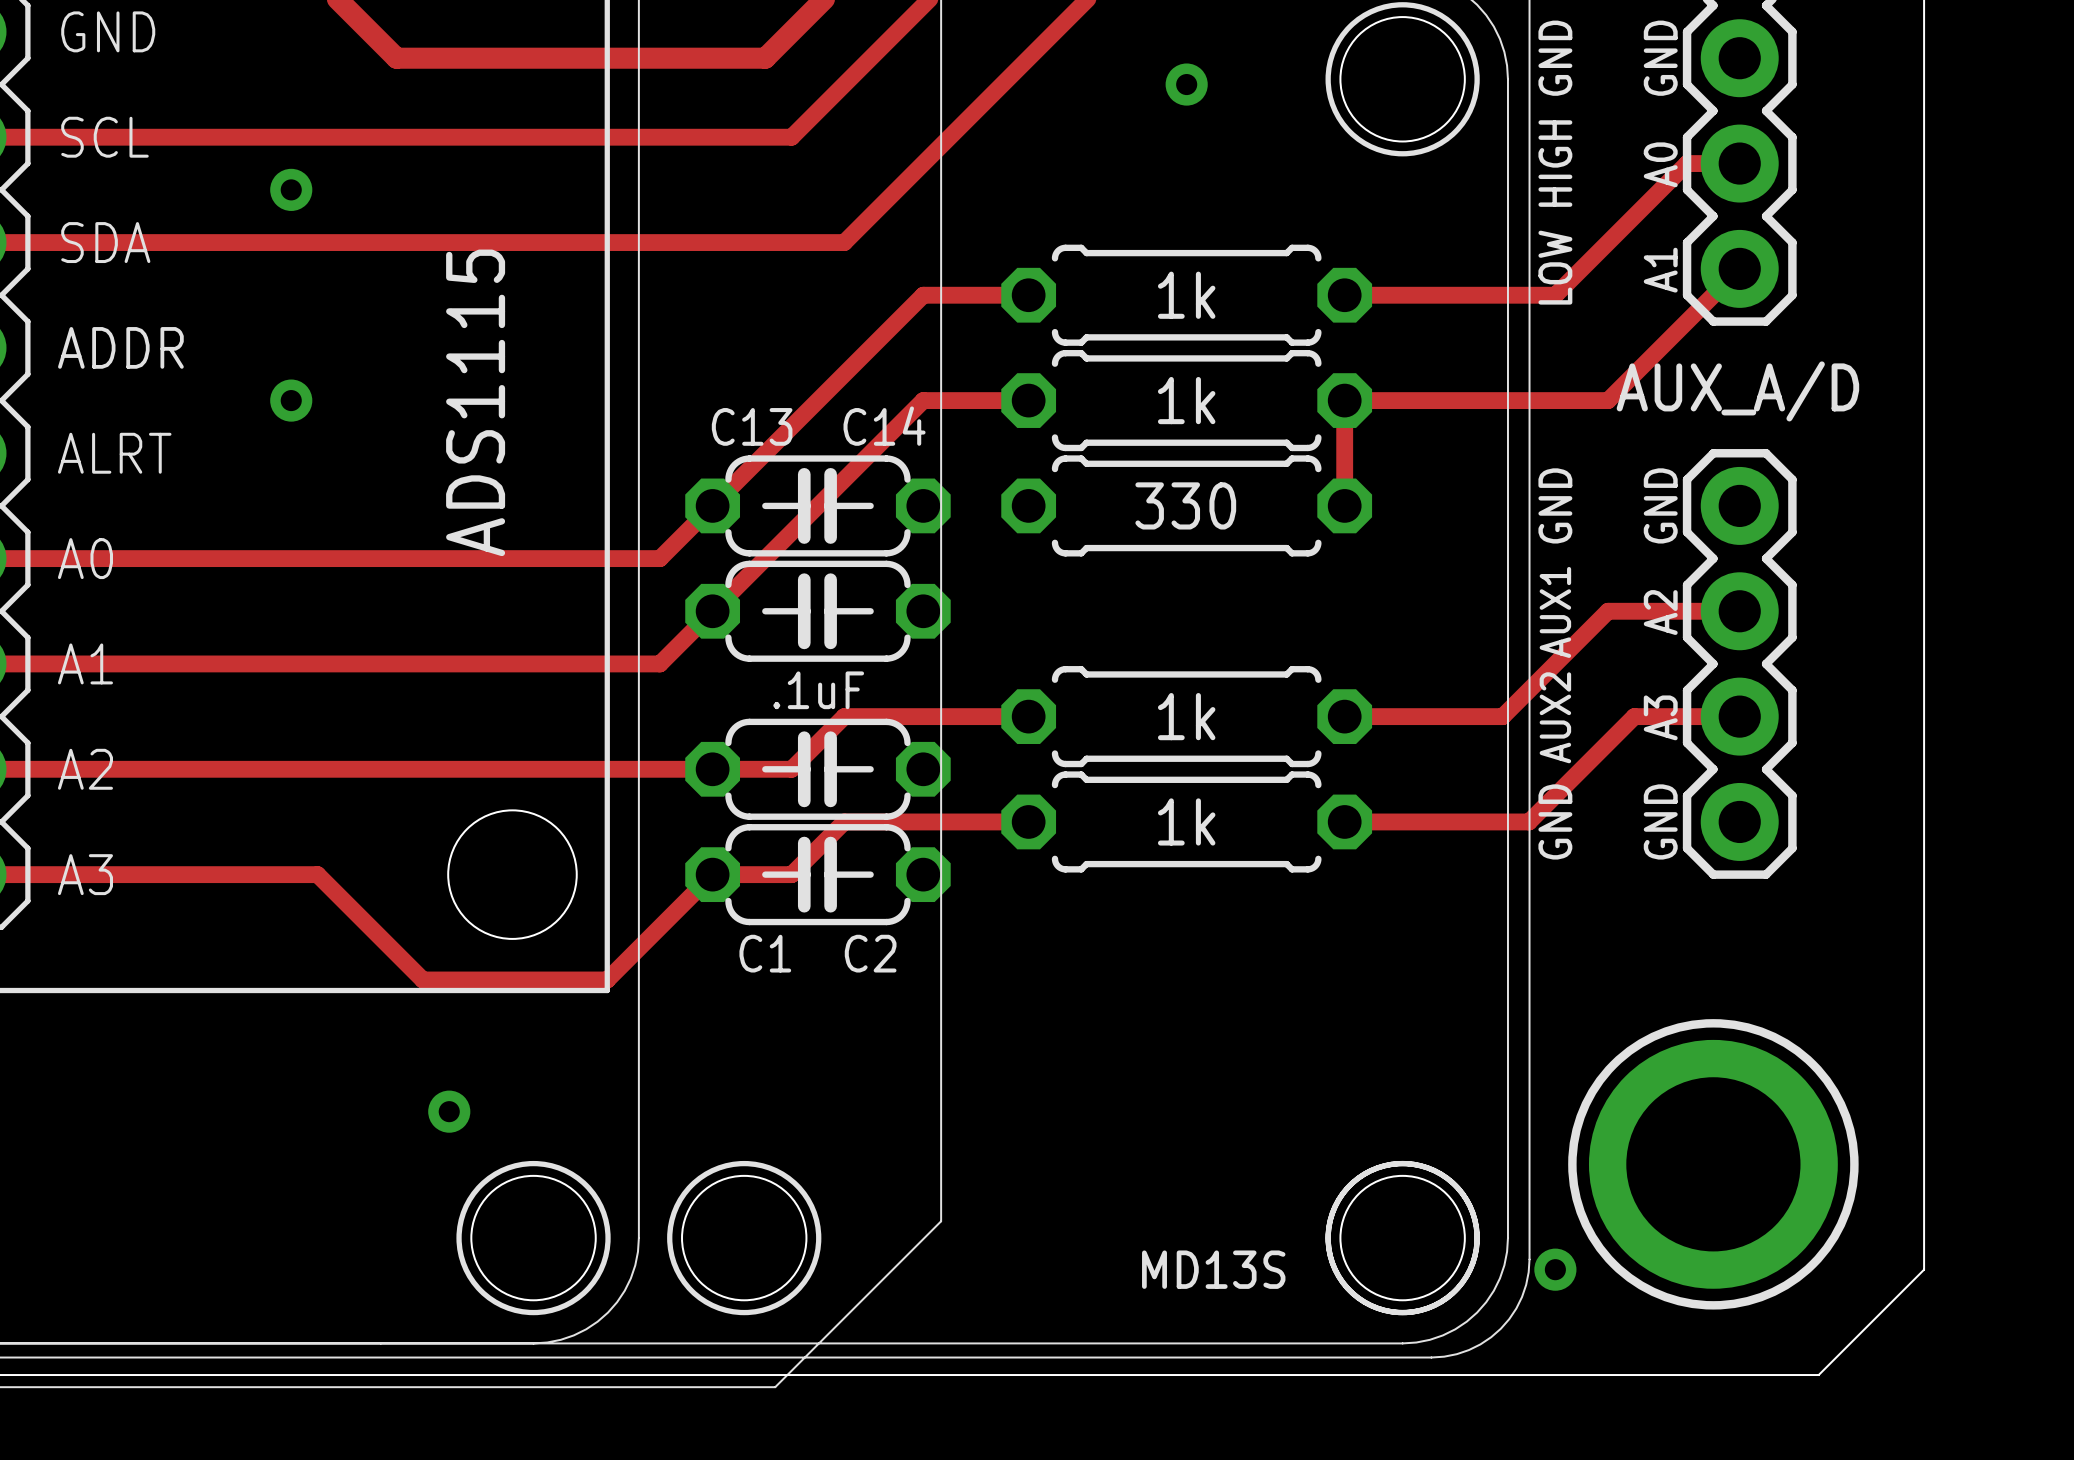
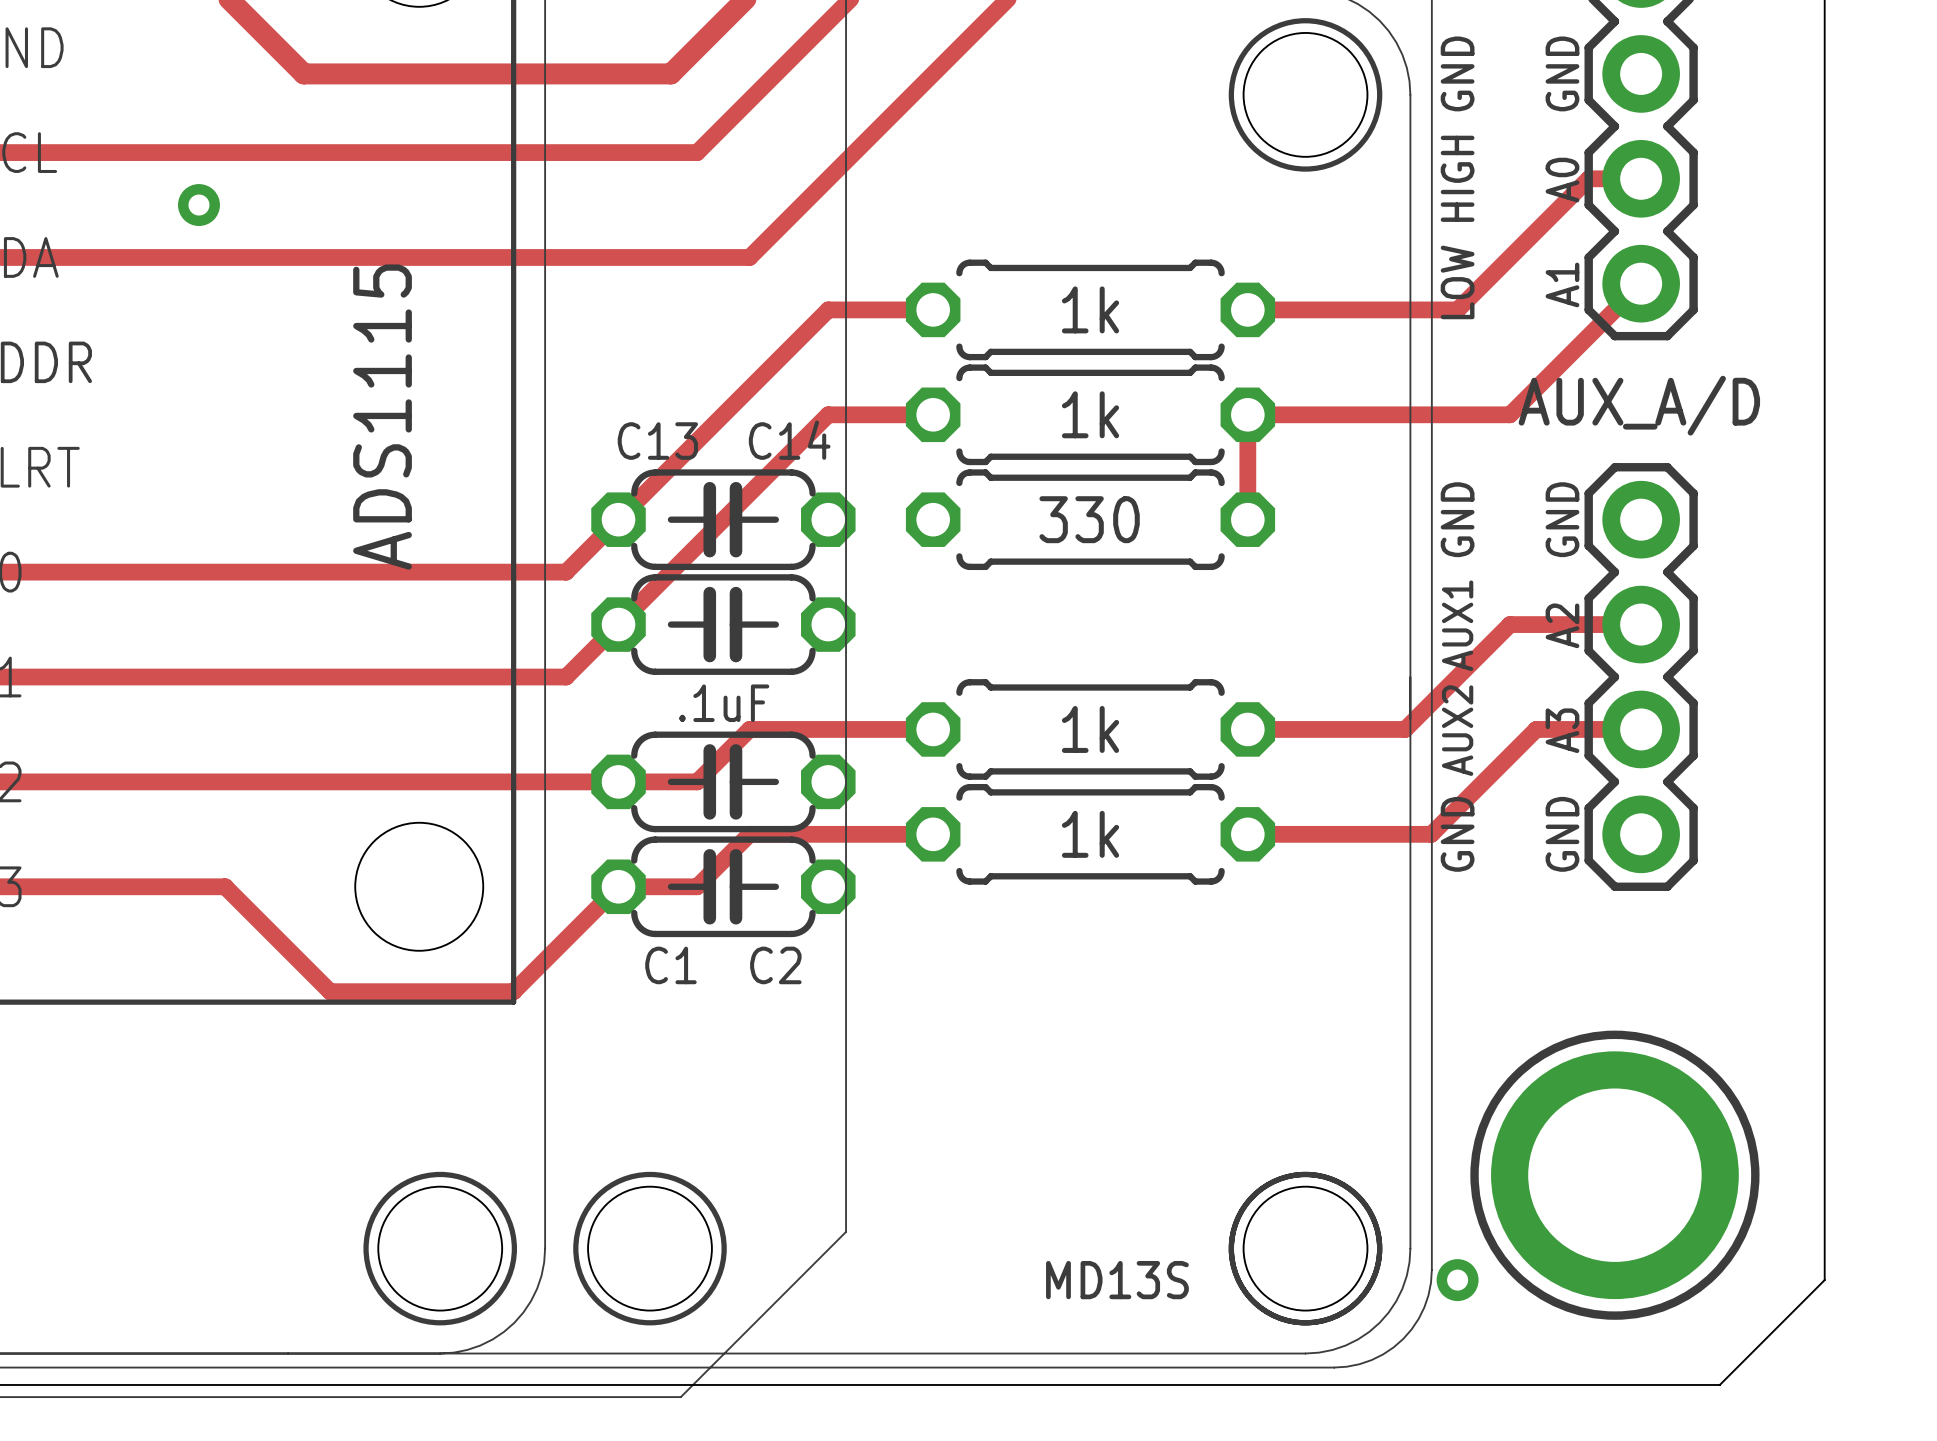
via: (1186, 84) -> none
via: (291, 400) -> none
via: (449, 1111) -> none

